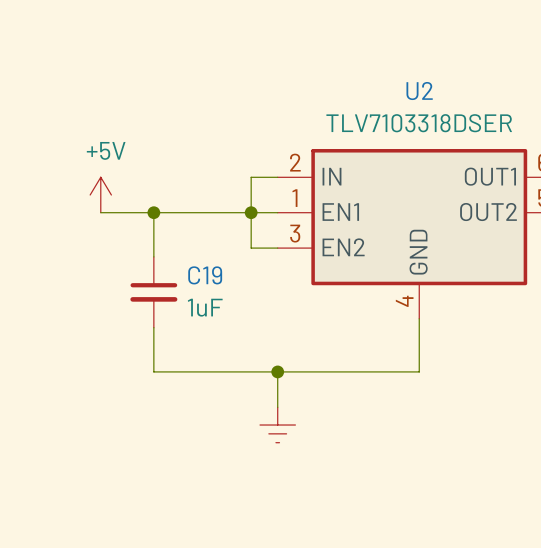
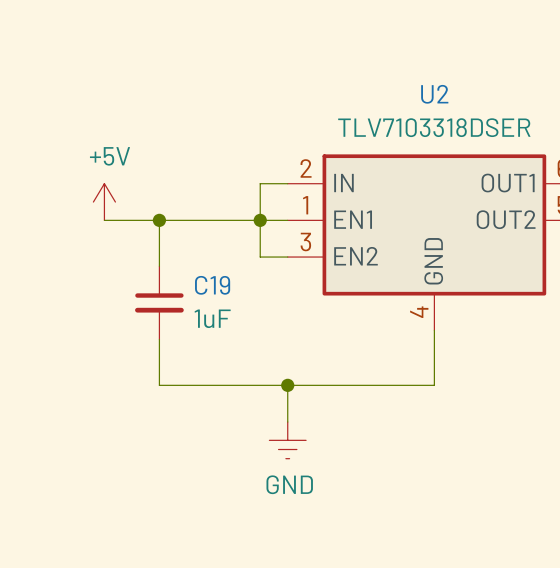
power symbol text: none -> GND (289, 484)

